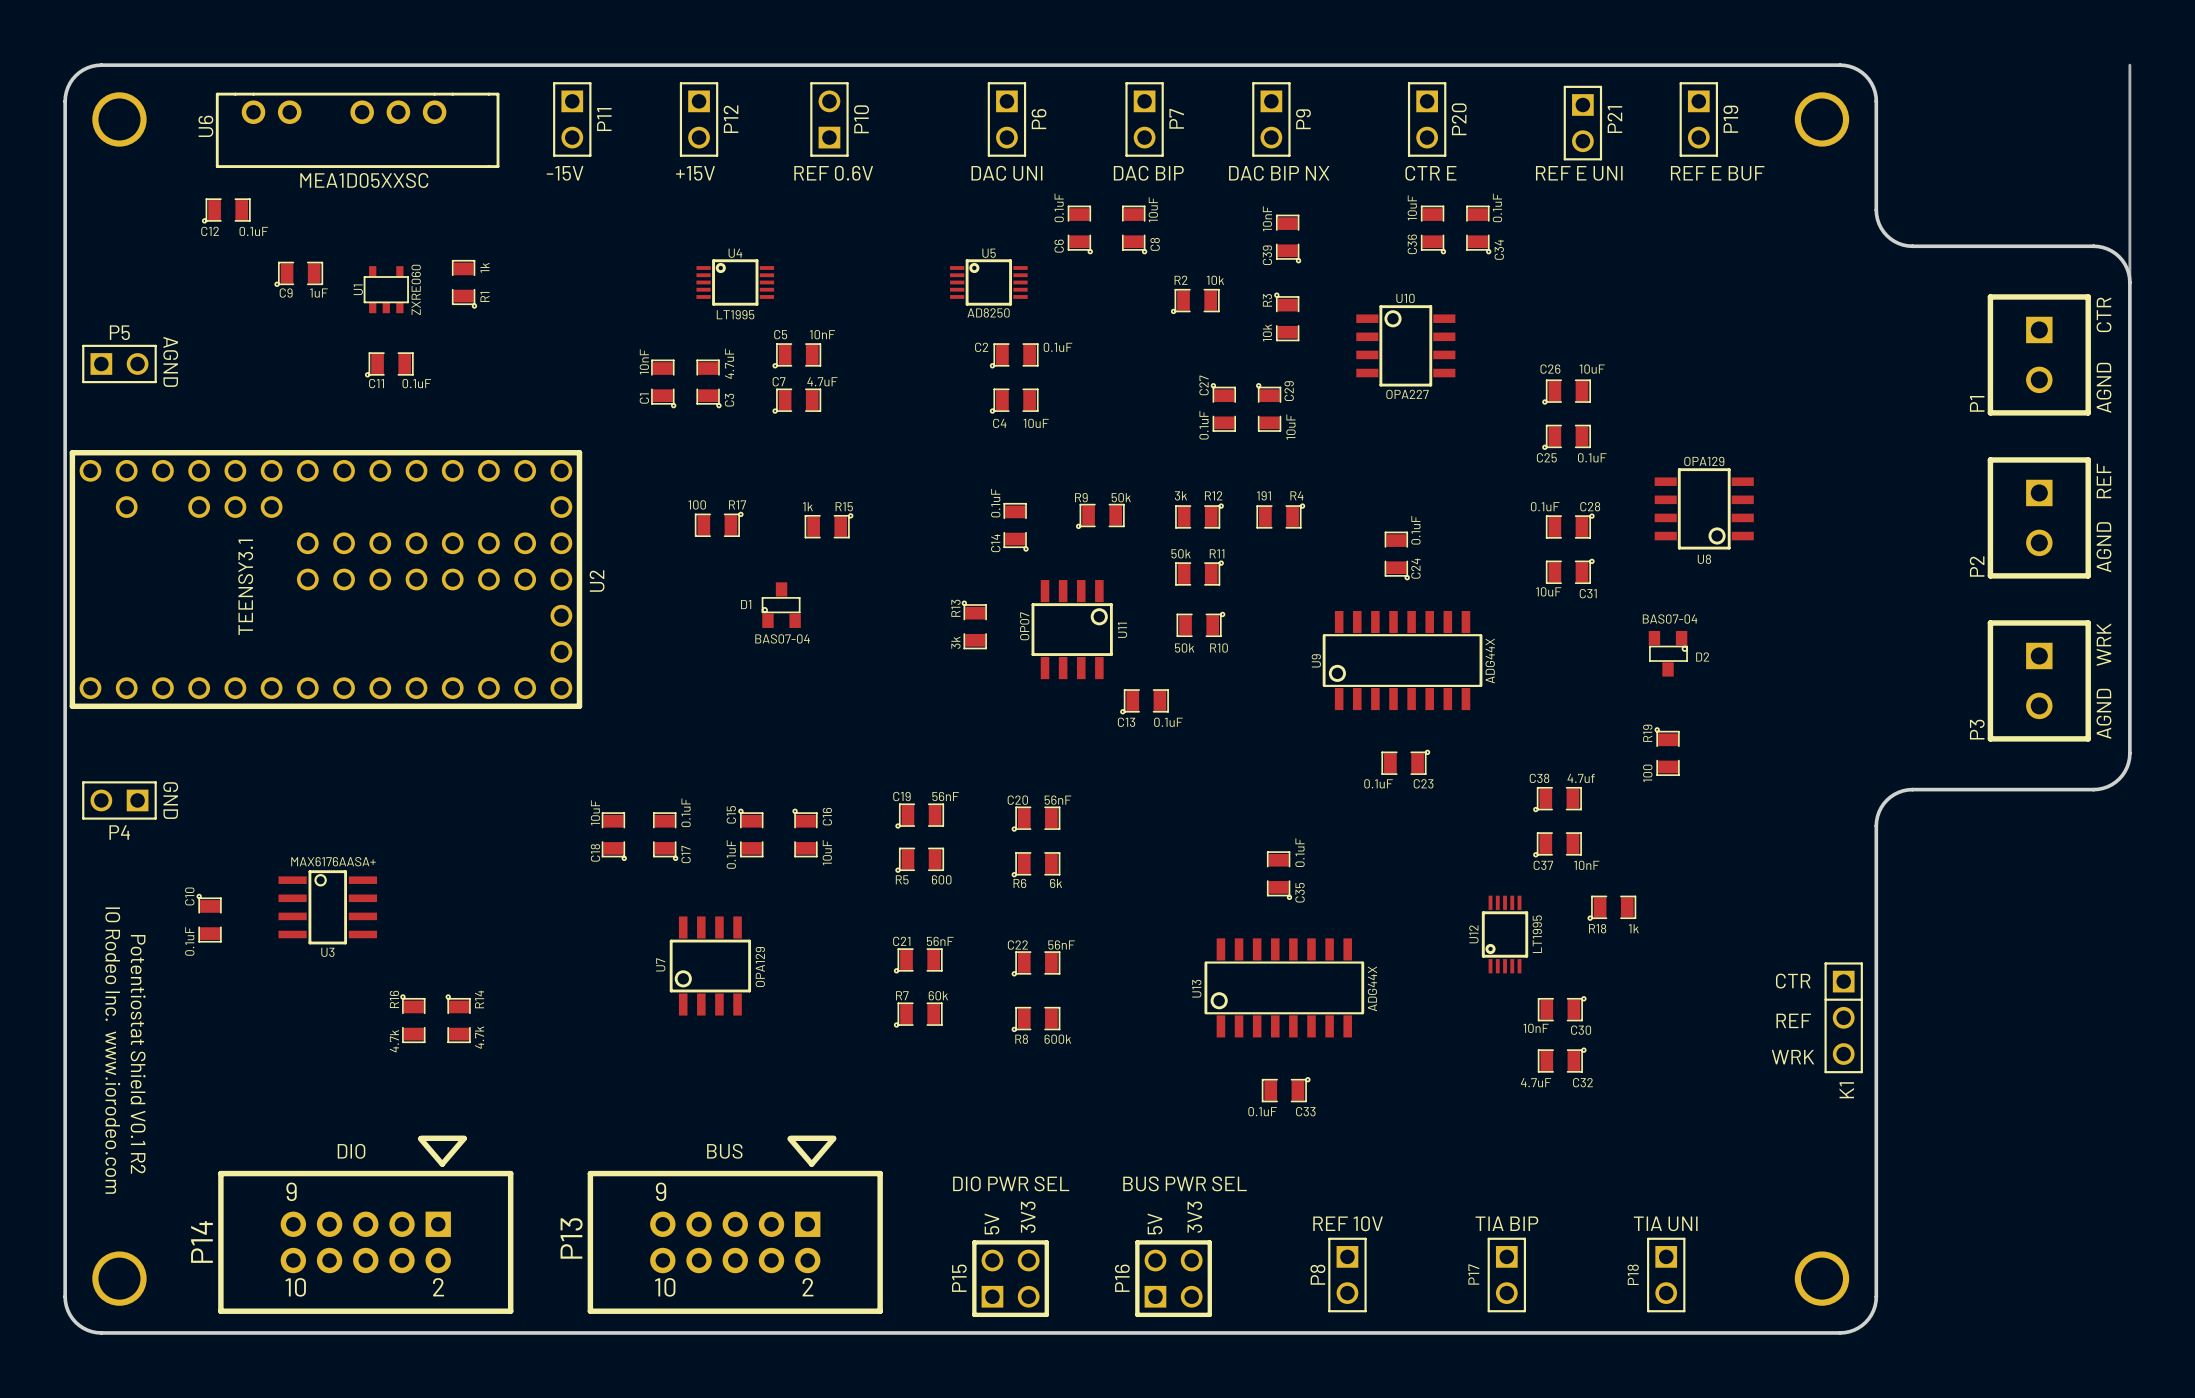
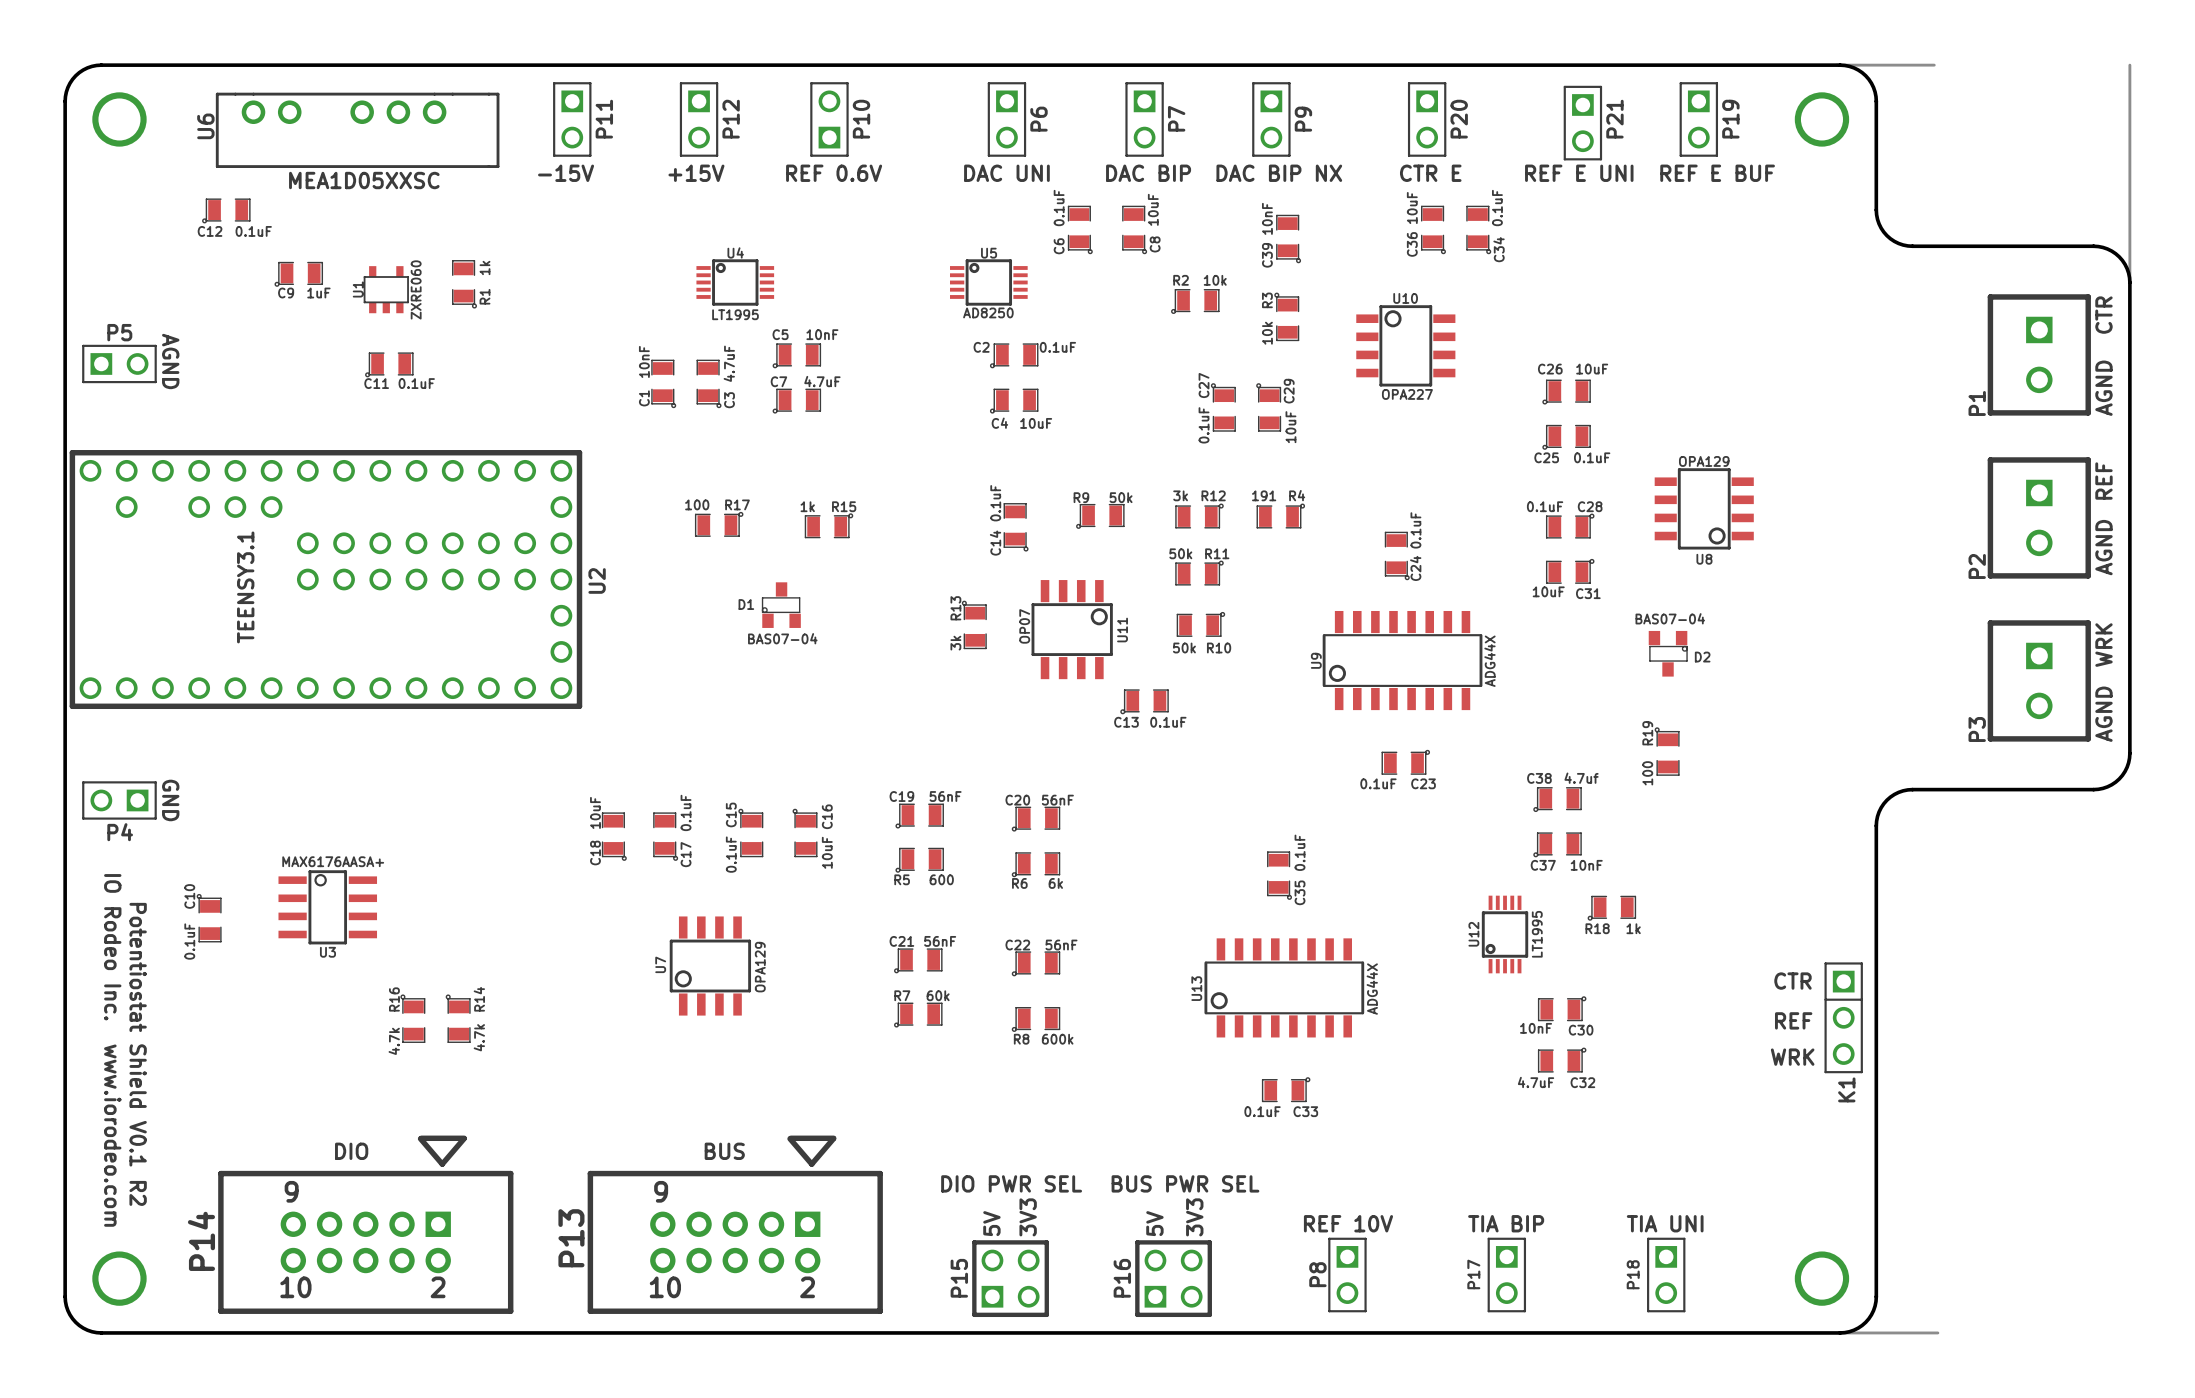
line: none -> (1836, 65) (1934, 65)
line: none -> (1840, 1332) (1937, 1332)

